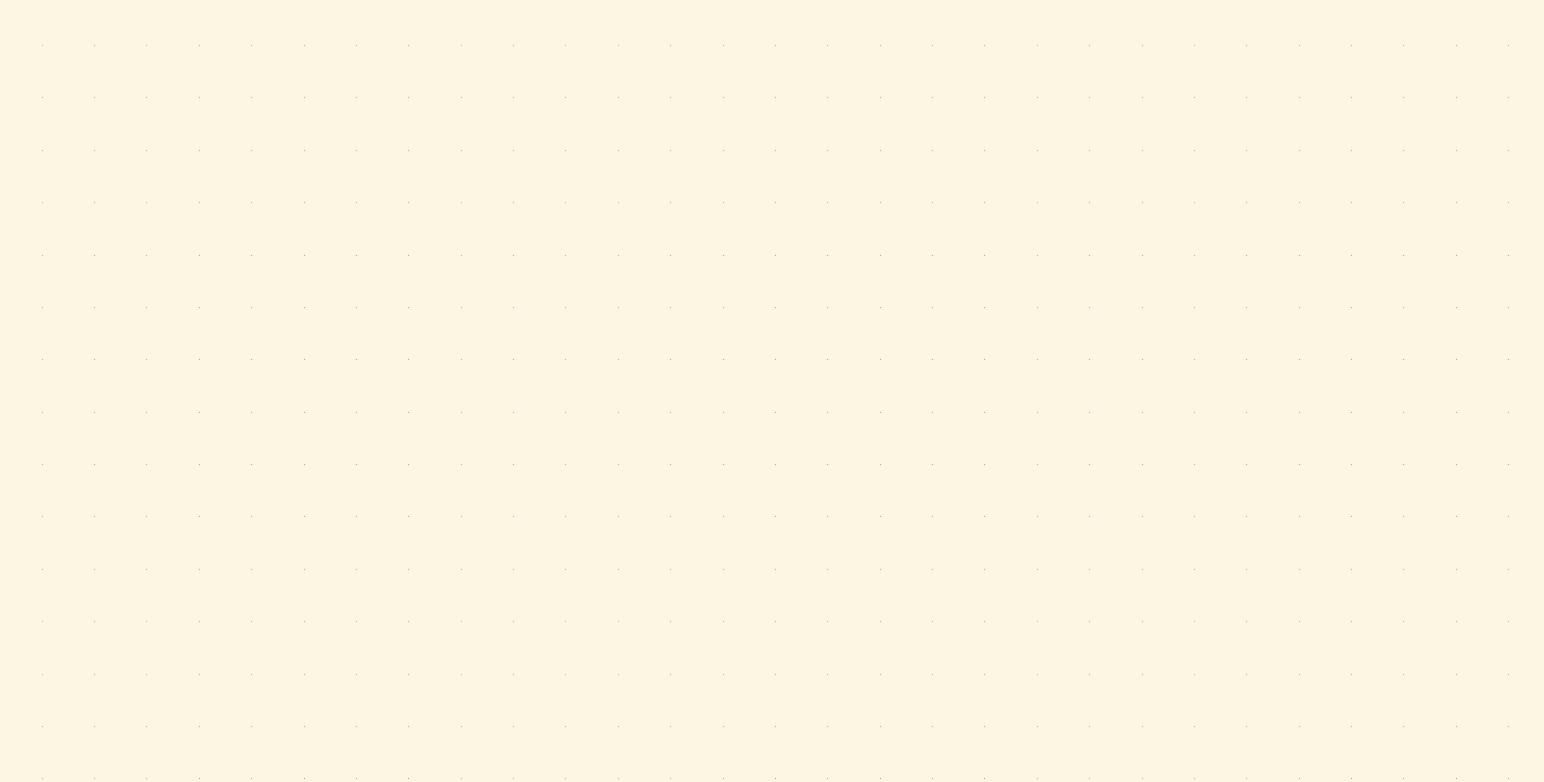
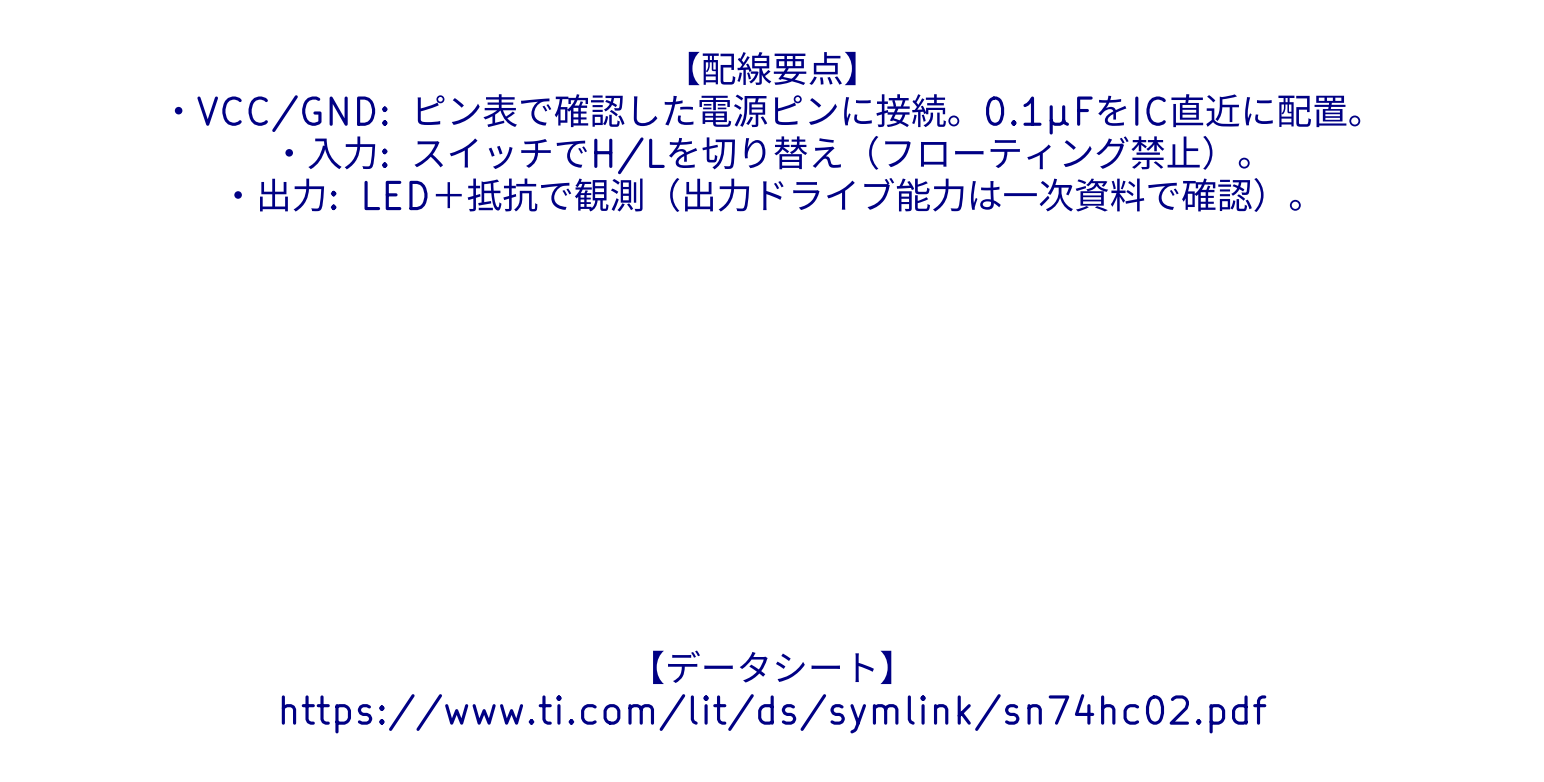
text: none -> 【配線要点】 (772, 68)
text: none -> ・VCC/GND: ピン表で確認した電源ピンに接続。0.1µFをIC直近に配置。 (767, 113)
text: none -> ・入力: スイッチでH/Lを切り替え（フローティング禁止）。 (767, 154)
text: none -> ・出力: LED＋抵抗で観測（出力ドライブ能力は一次資料で確認）。 (767, 194)
text: none -> 【データシート】 (772, 667)
text: none -> https://www.ti.com/lit/ds/symlink/sn74hc02.pdf (774, 713)

